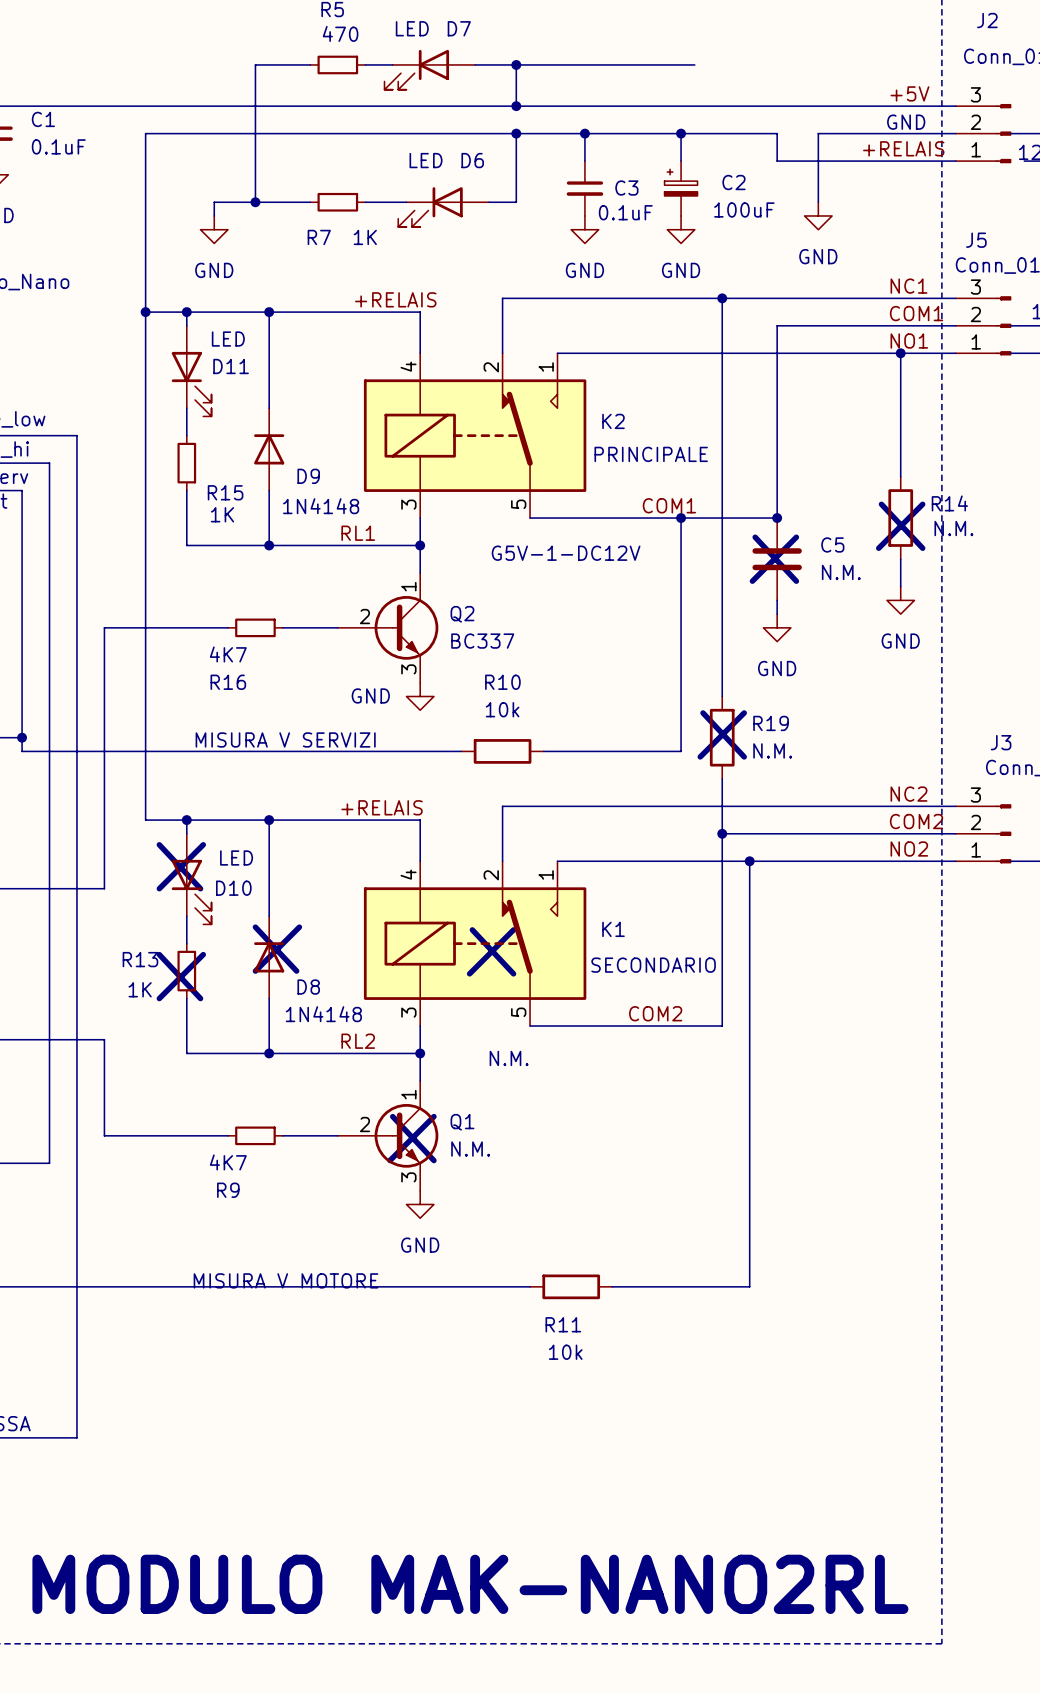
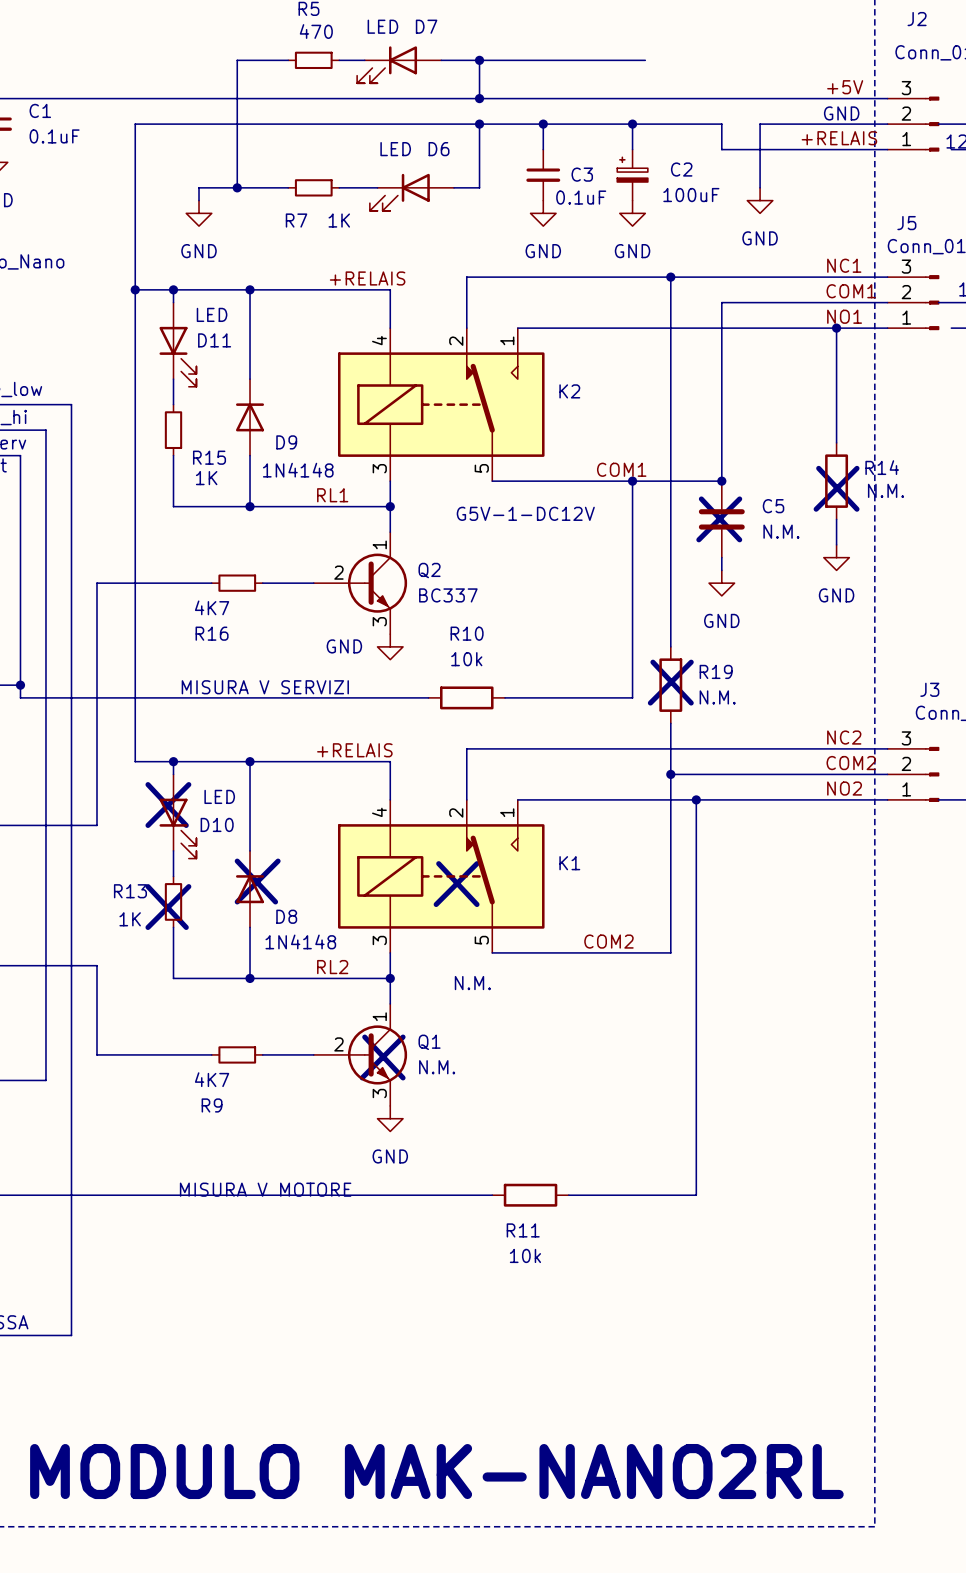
wire: (1010, 353) (1024, 353) -> none
text: PRINCIPALE (651, 454) -> none
text: SECONDARIO (653, 965) -> none

